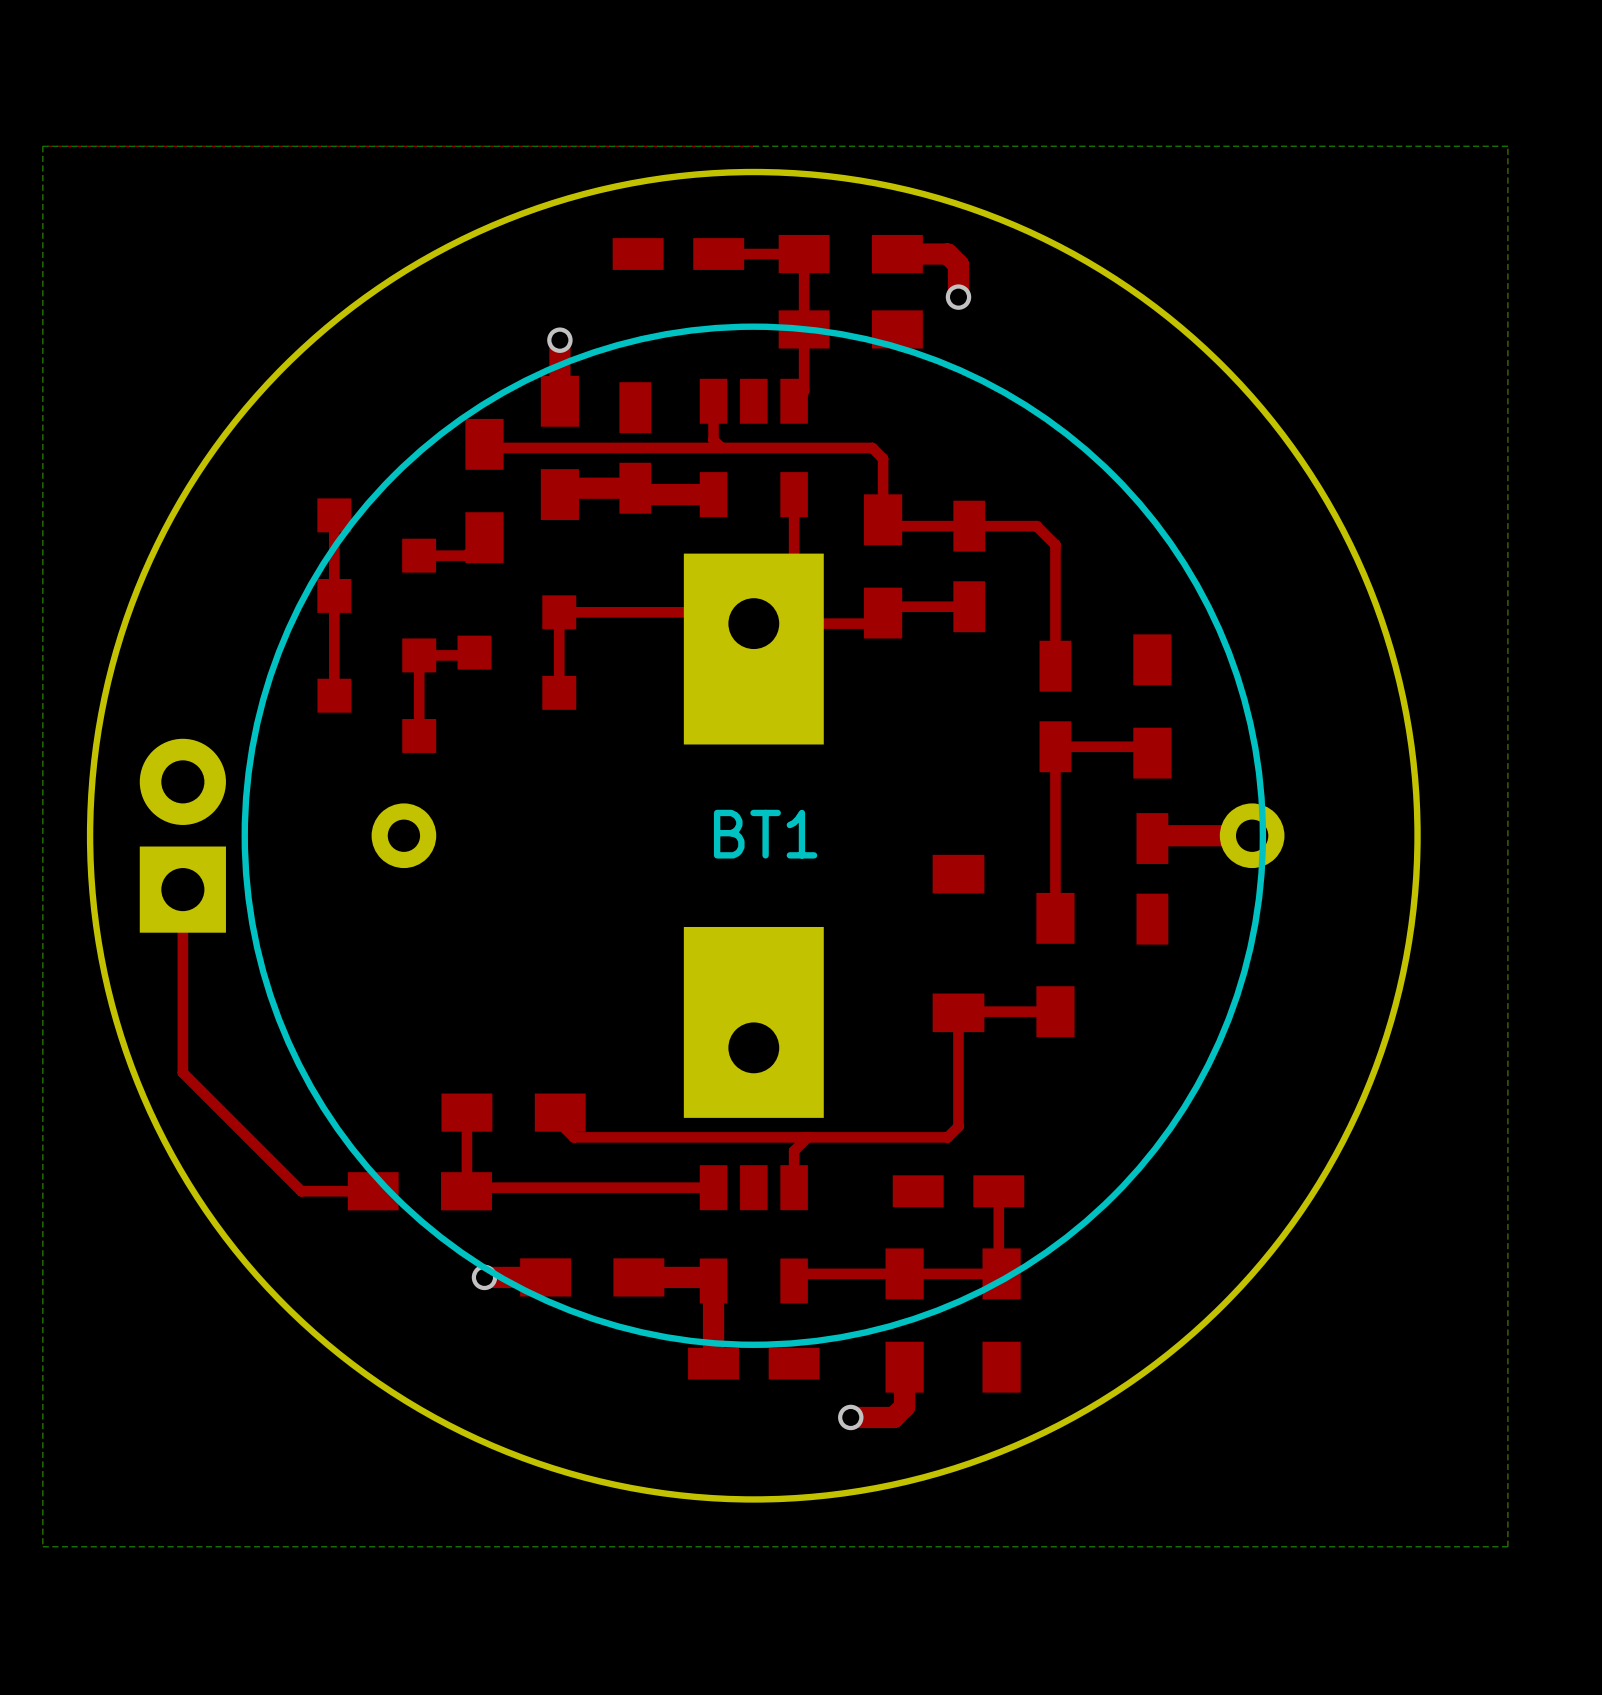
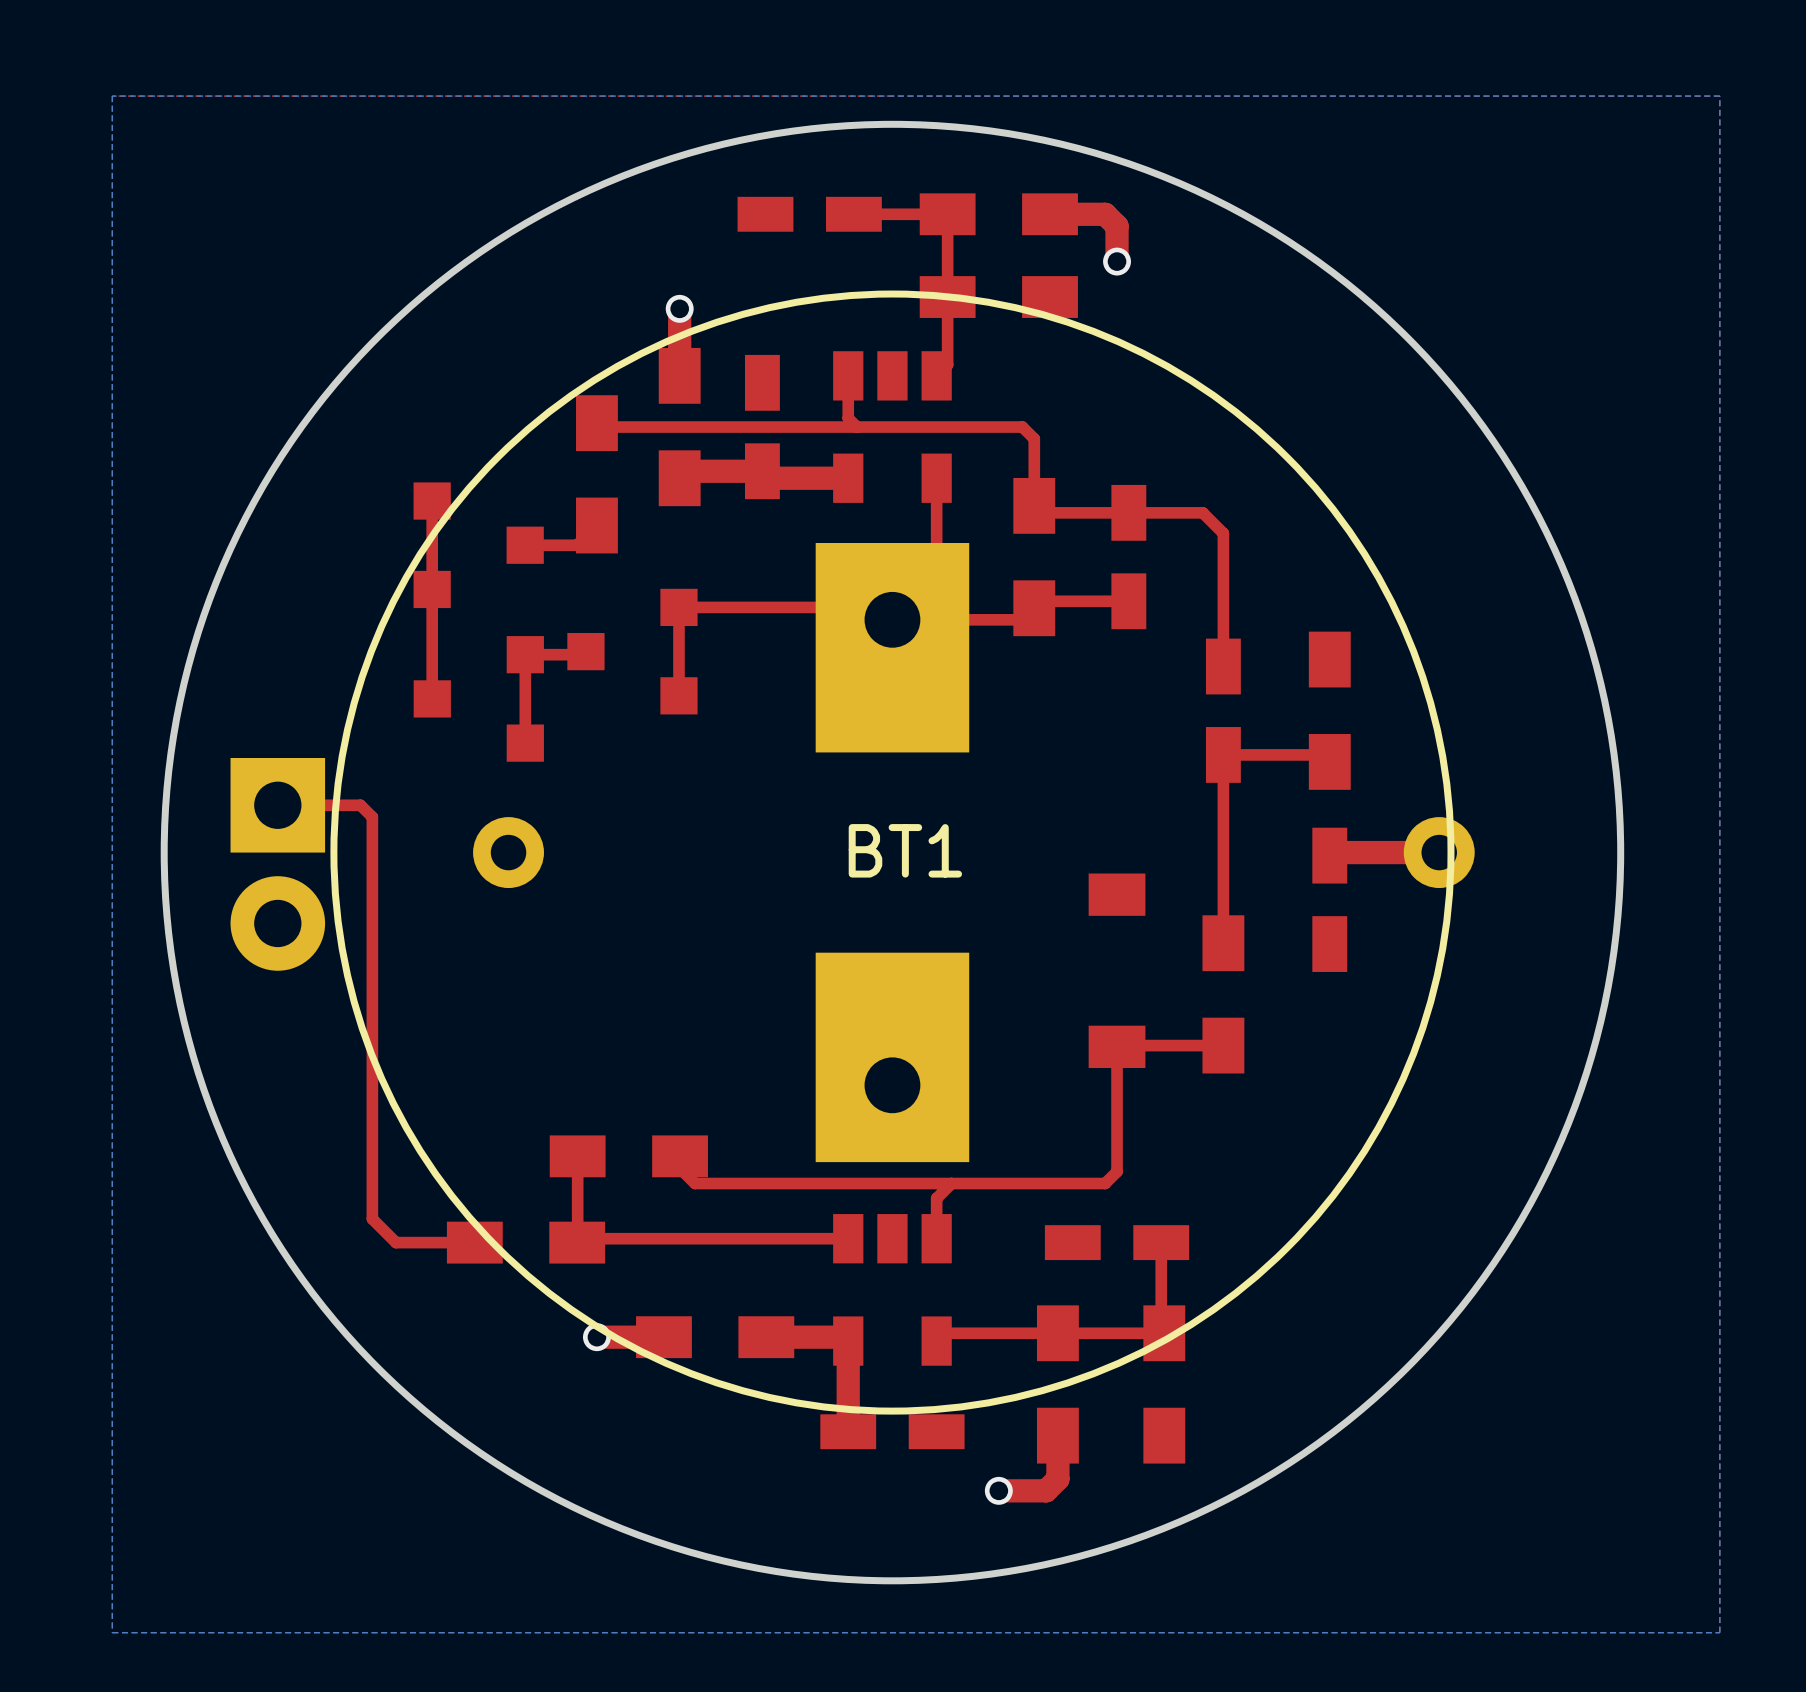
part rotation: 0° (182, 835) -> 180° (277, 864)
top track: (182, 889) (182, 1072) (279, 1169) -> (277, 805) (360, 805) (372, 817) (372, 1218)

